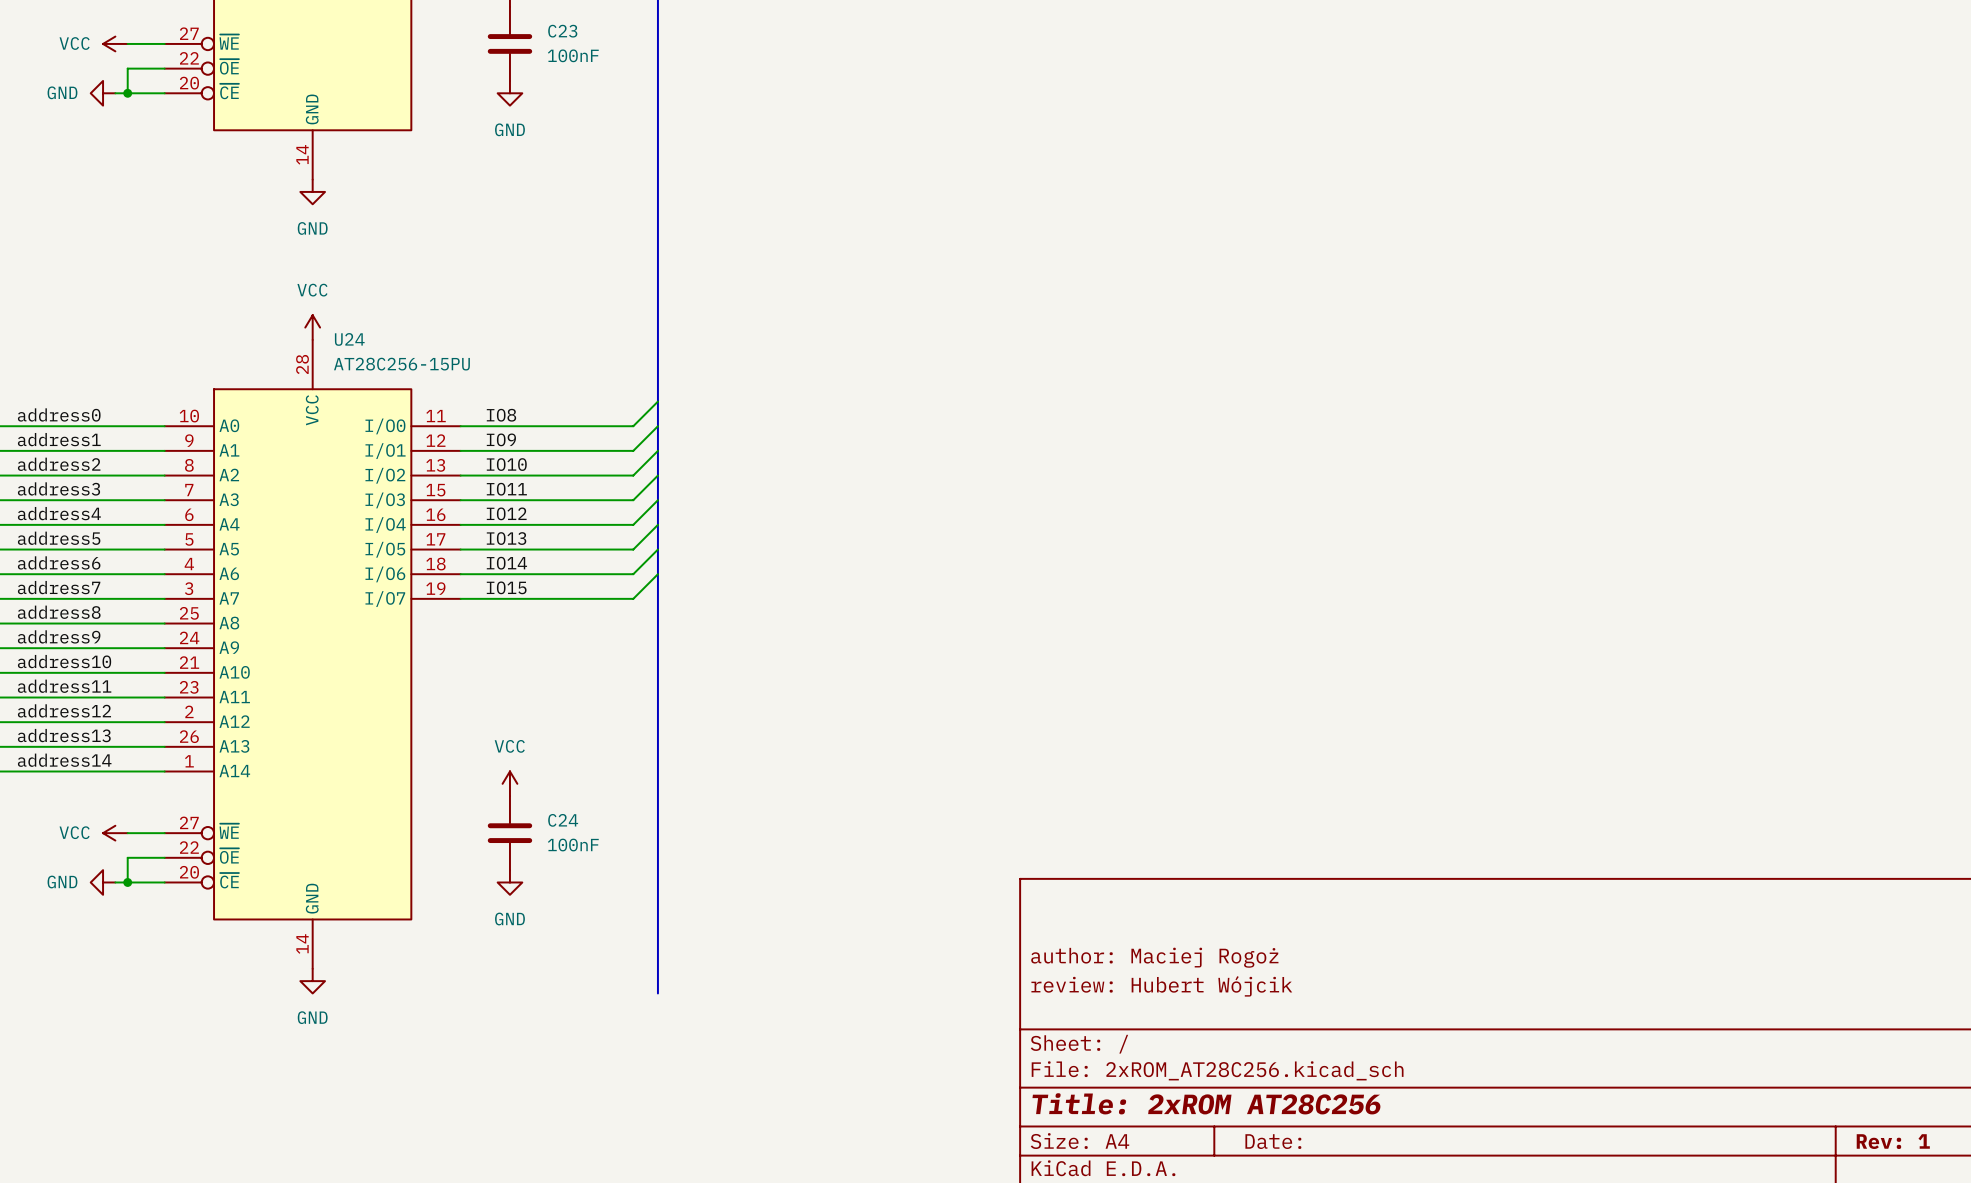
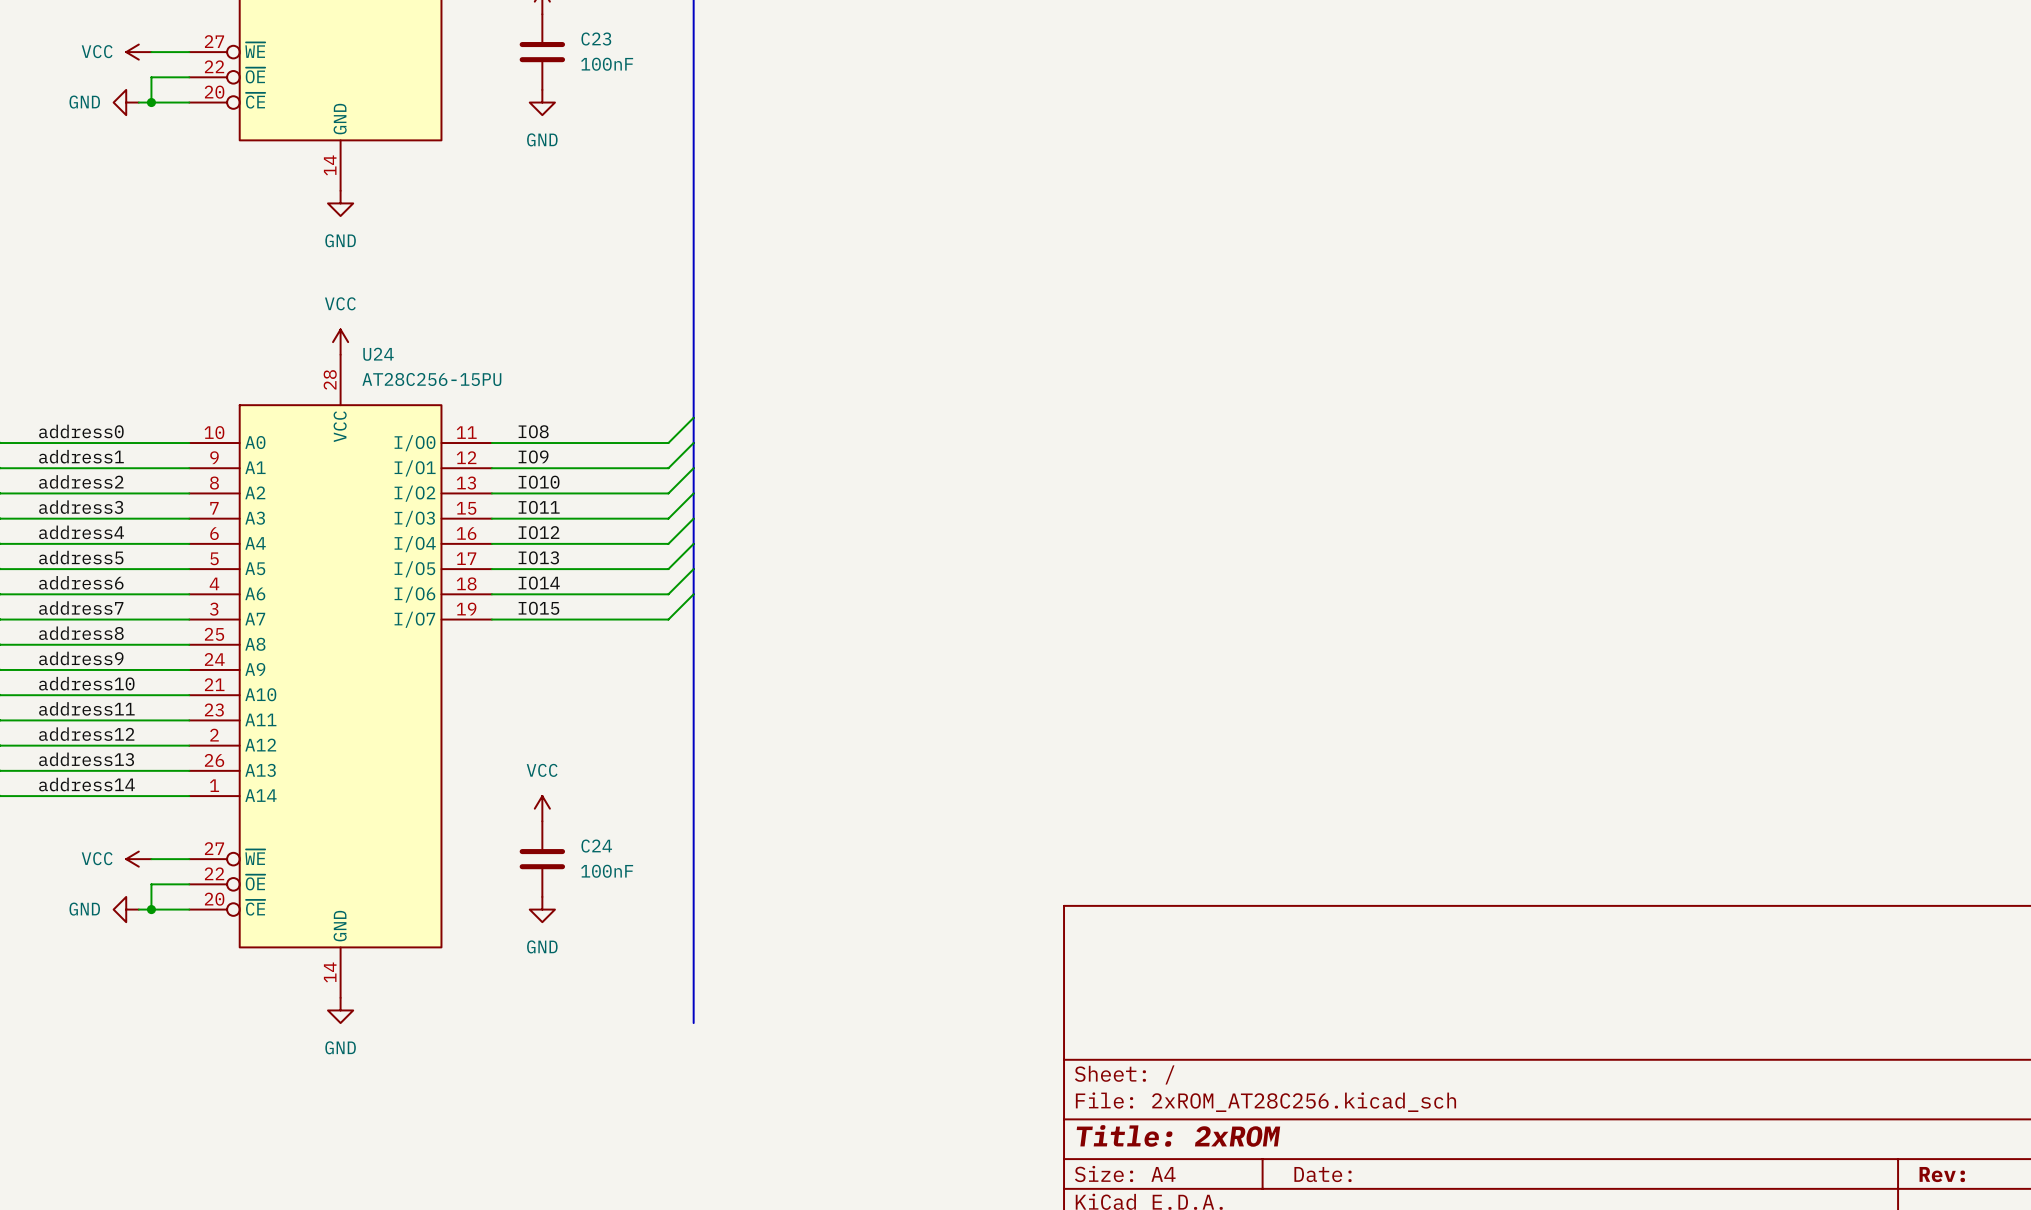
title block: author: Maciej Rogoż (1154, 957) -> none
title block: review: Hubert Wójcik (1161, 986) -> none
title block: Title: 2xROM AT28C256 (1206, 1103) -> Title: 2xROM (1178, 1135)
title block: Rev: 1 (1893, 1141) -> Rev: (1942, 1174)

